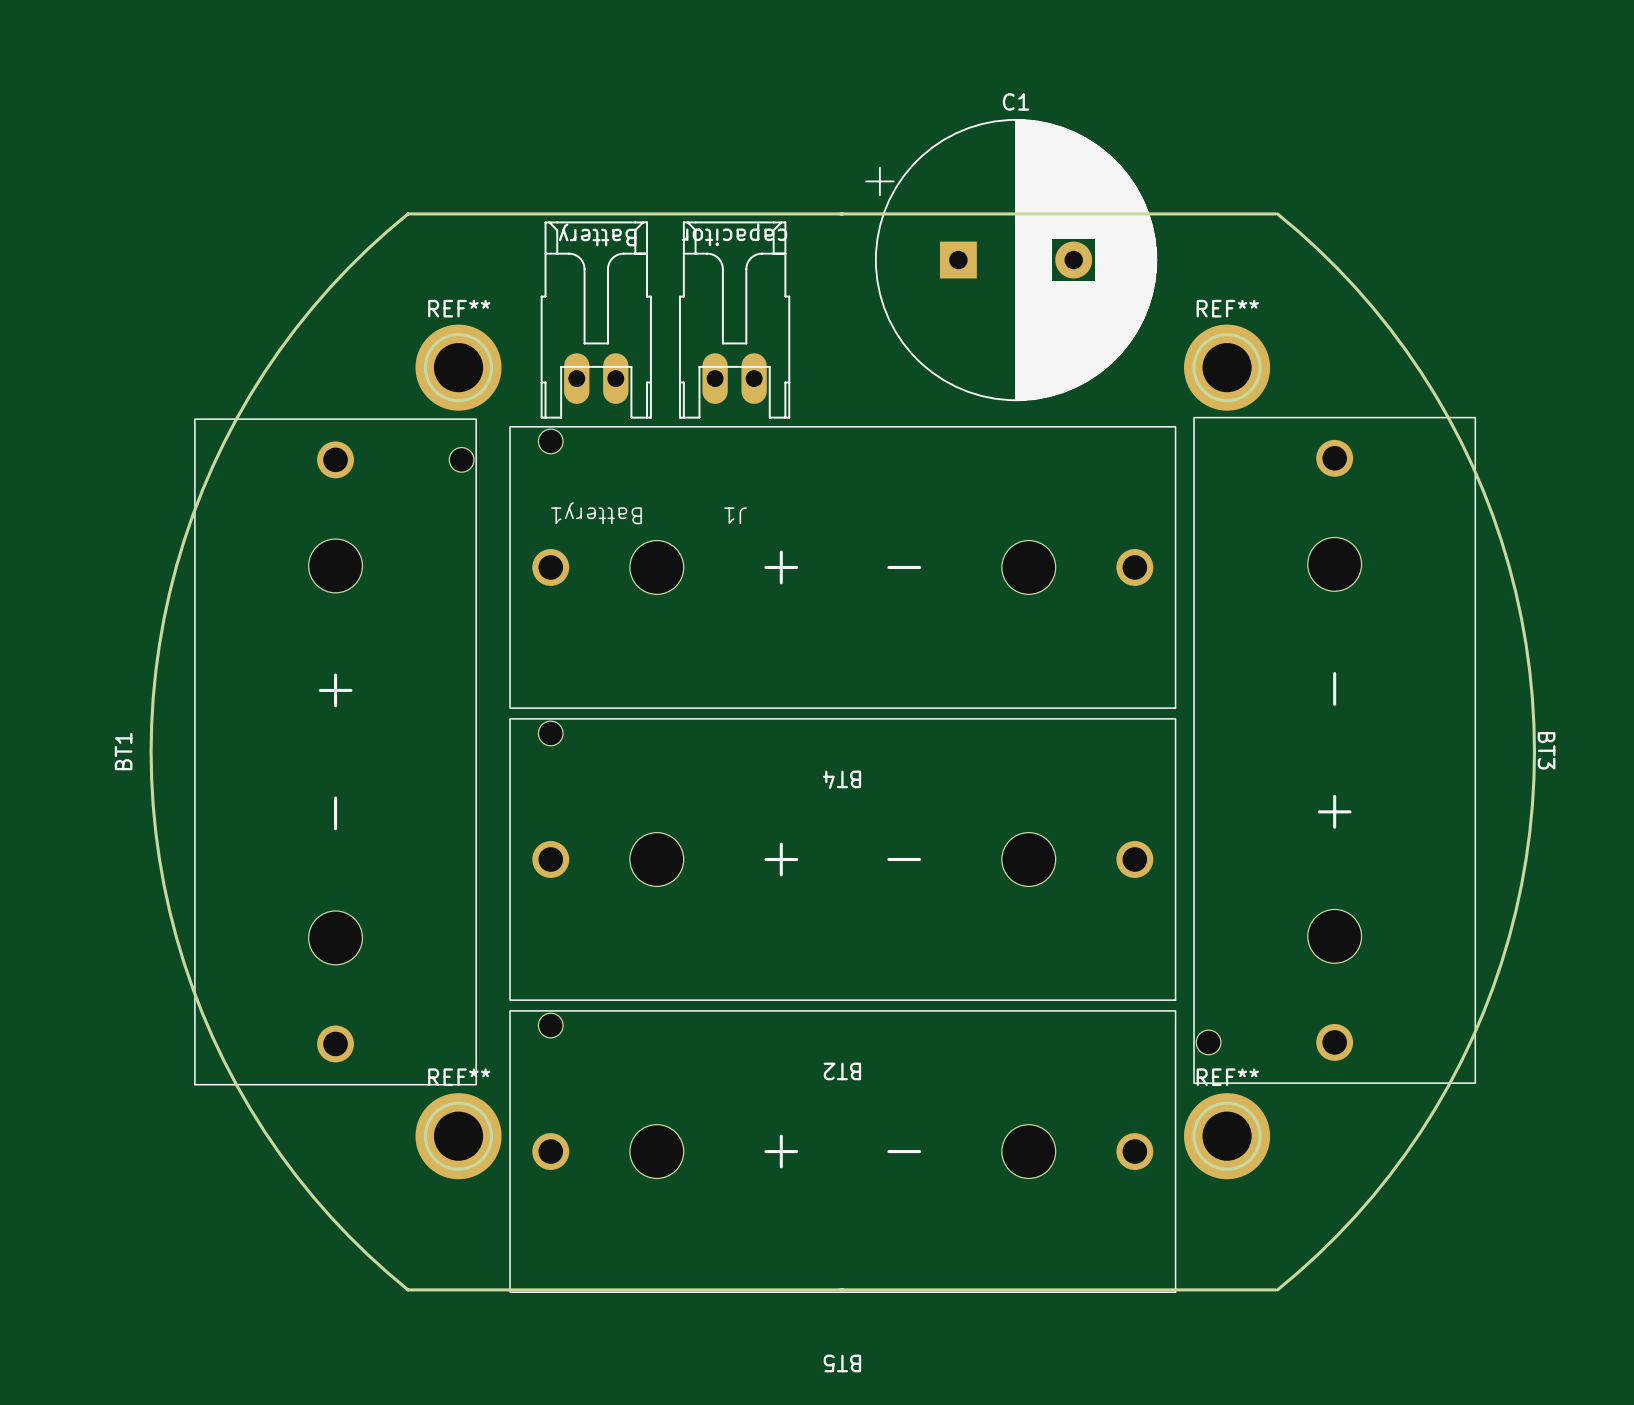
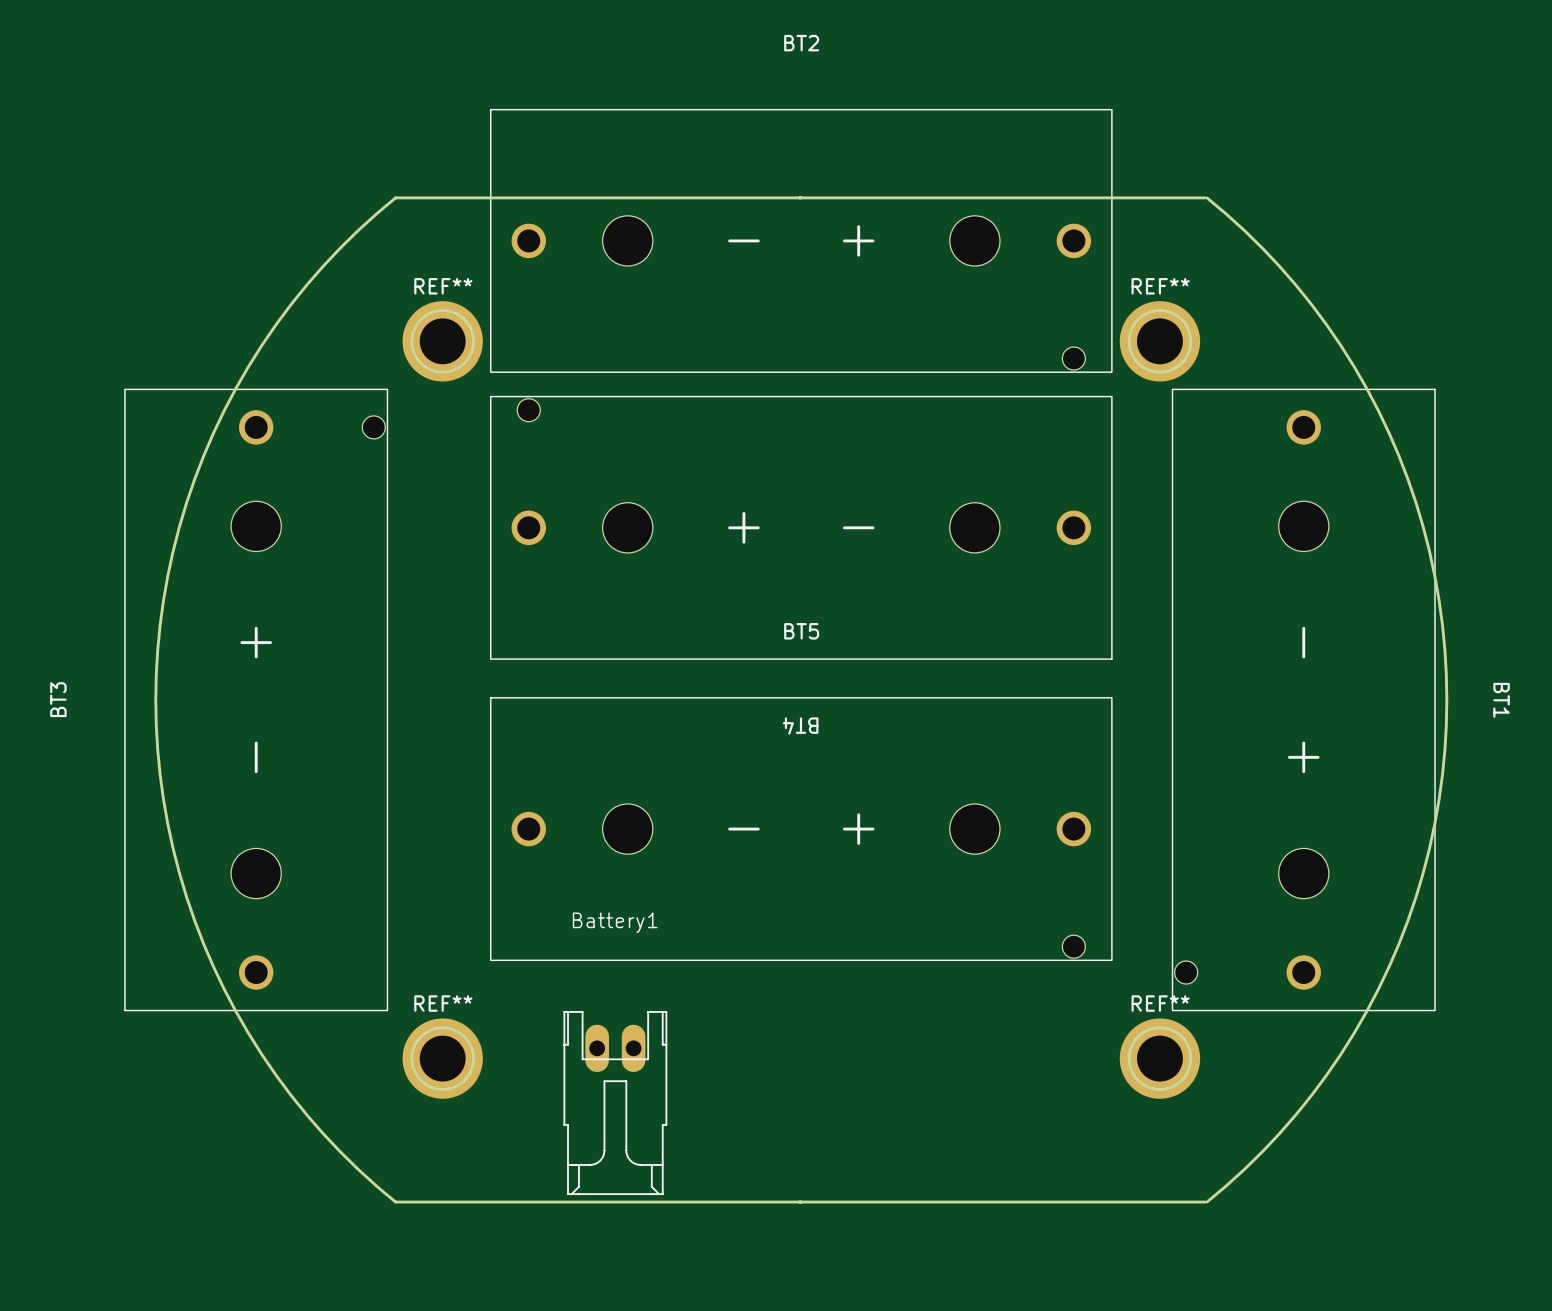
text: capacitor (734, 234) -> none
text: Battery (597, 235) -> none
C1: (1011, 260) -> none
Battery1 rotation: 0° (596, 320) -> 180° (615, 1103)
Battery1 position: (596, 320) -> (615, 1103)
J1: (734, 320) -> none
BT3 rotation: 0° (1334, 750) -> 180° (256, 699)
BT3 position: (1334, 750) -> (256, 699)
BT1 rotation: 0° (335, 751) -> 180° (1303, 699)
BT1 position: (335, 751) -> (1303, 699)
BT2 rotation: 0° (842, 859) -> 180° (801, 240)
BT2 position: (842, 859) -> (801, 240)
BT5 rotation: 0° (842, 1151) -> 180° (801, 829)

